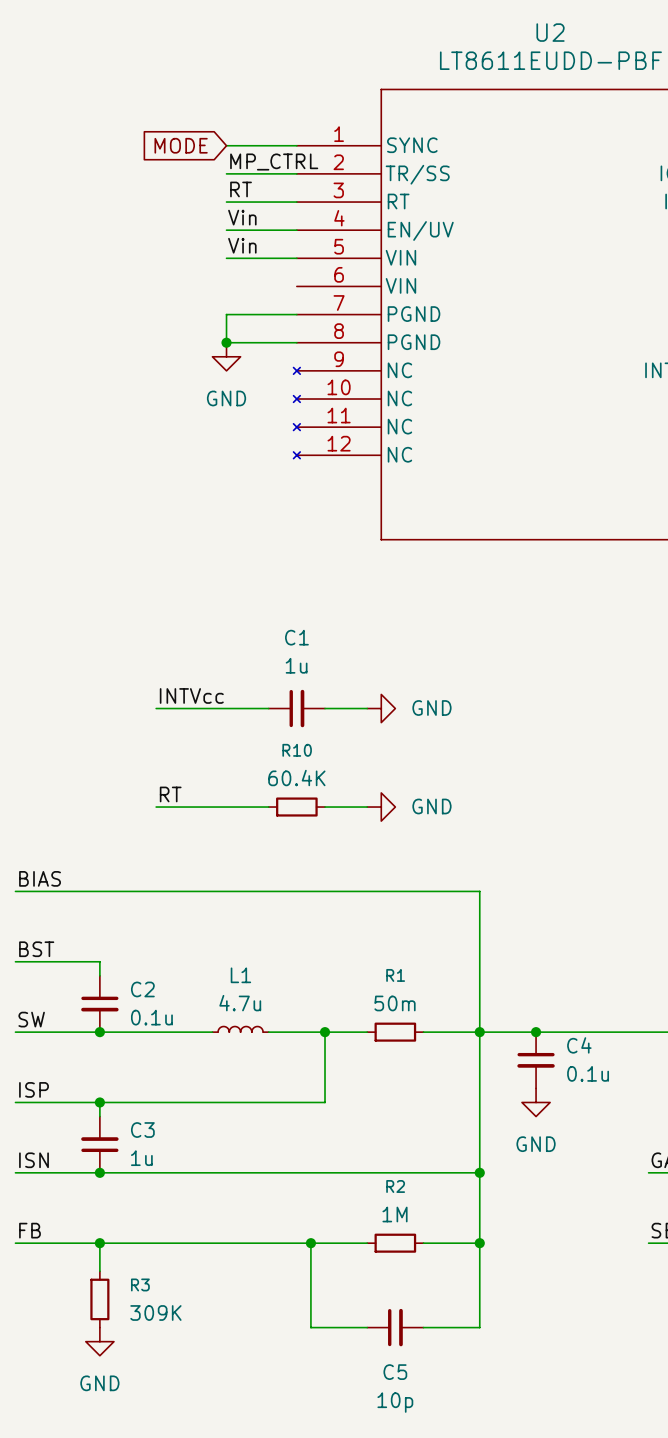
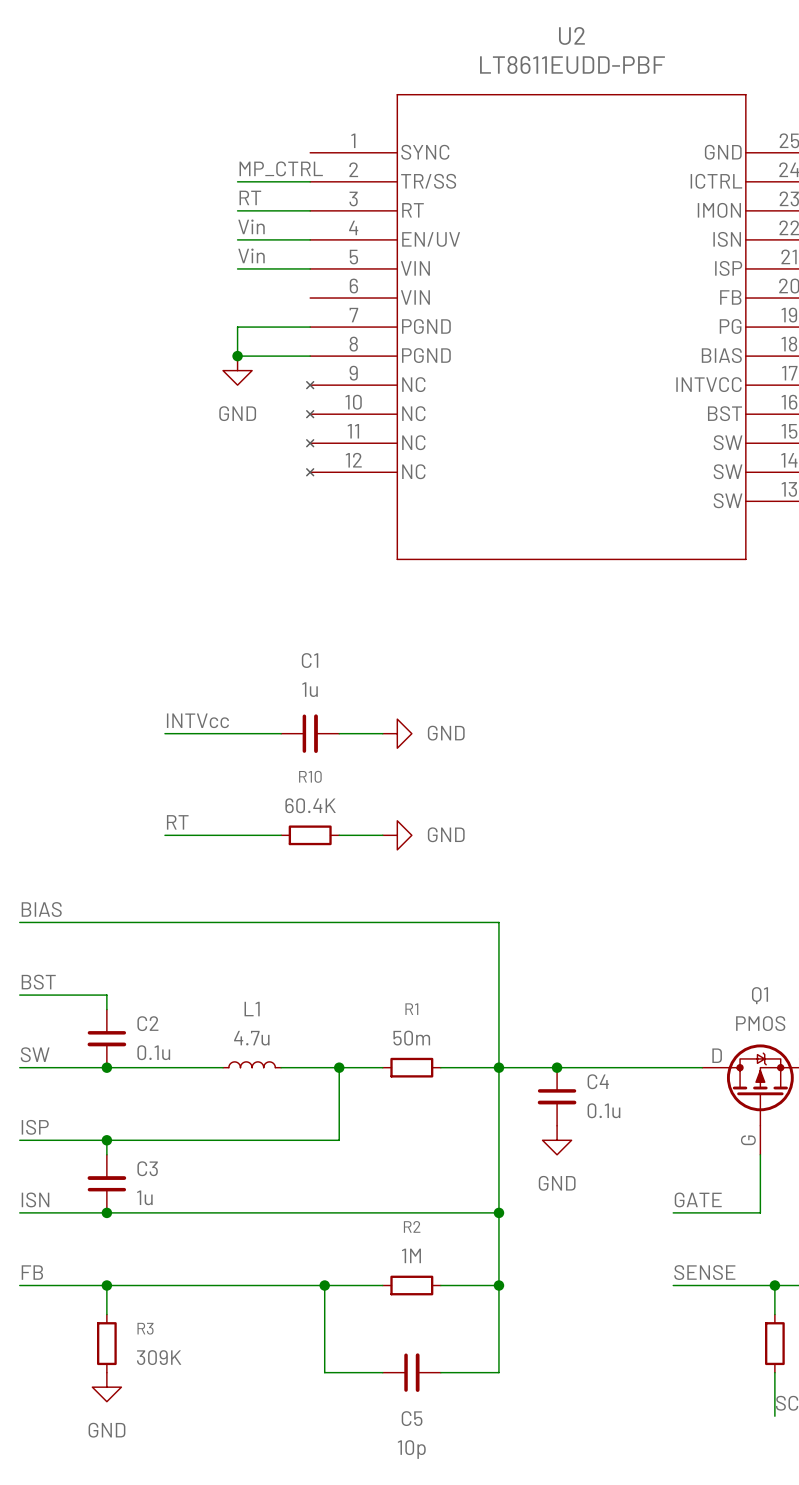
global label: MODE (181, 145) -> none
wire: (226, 145) (296, 145) -> none

